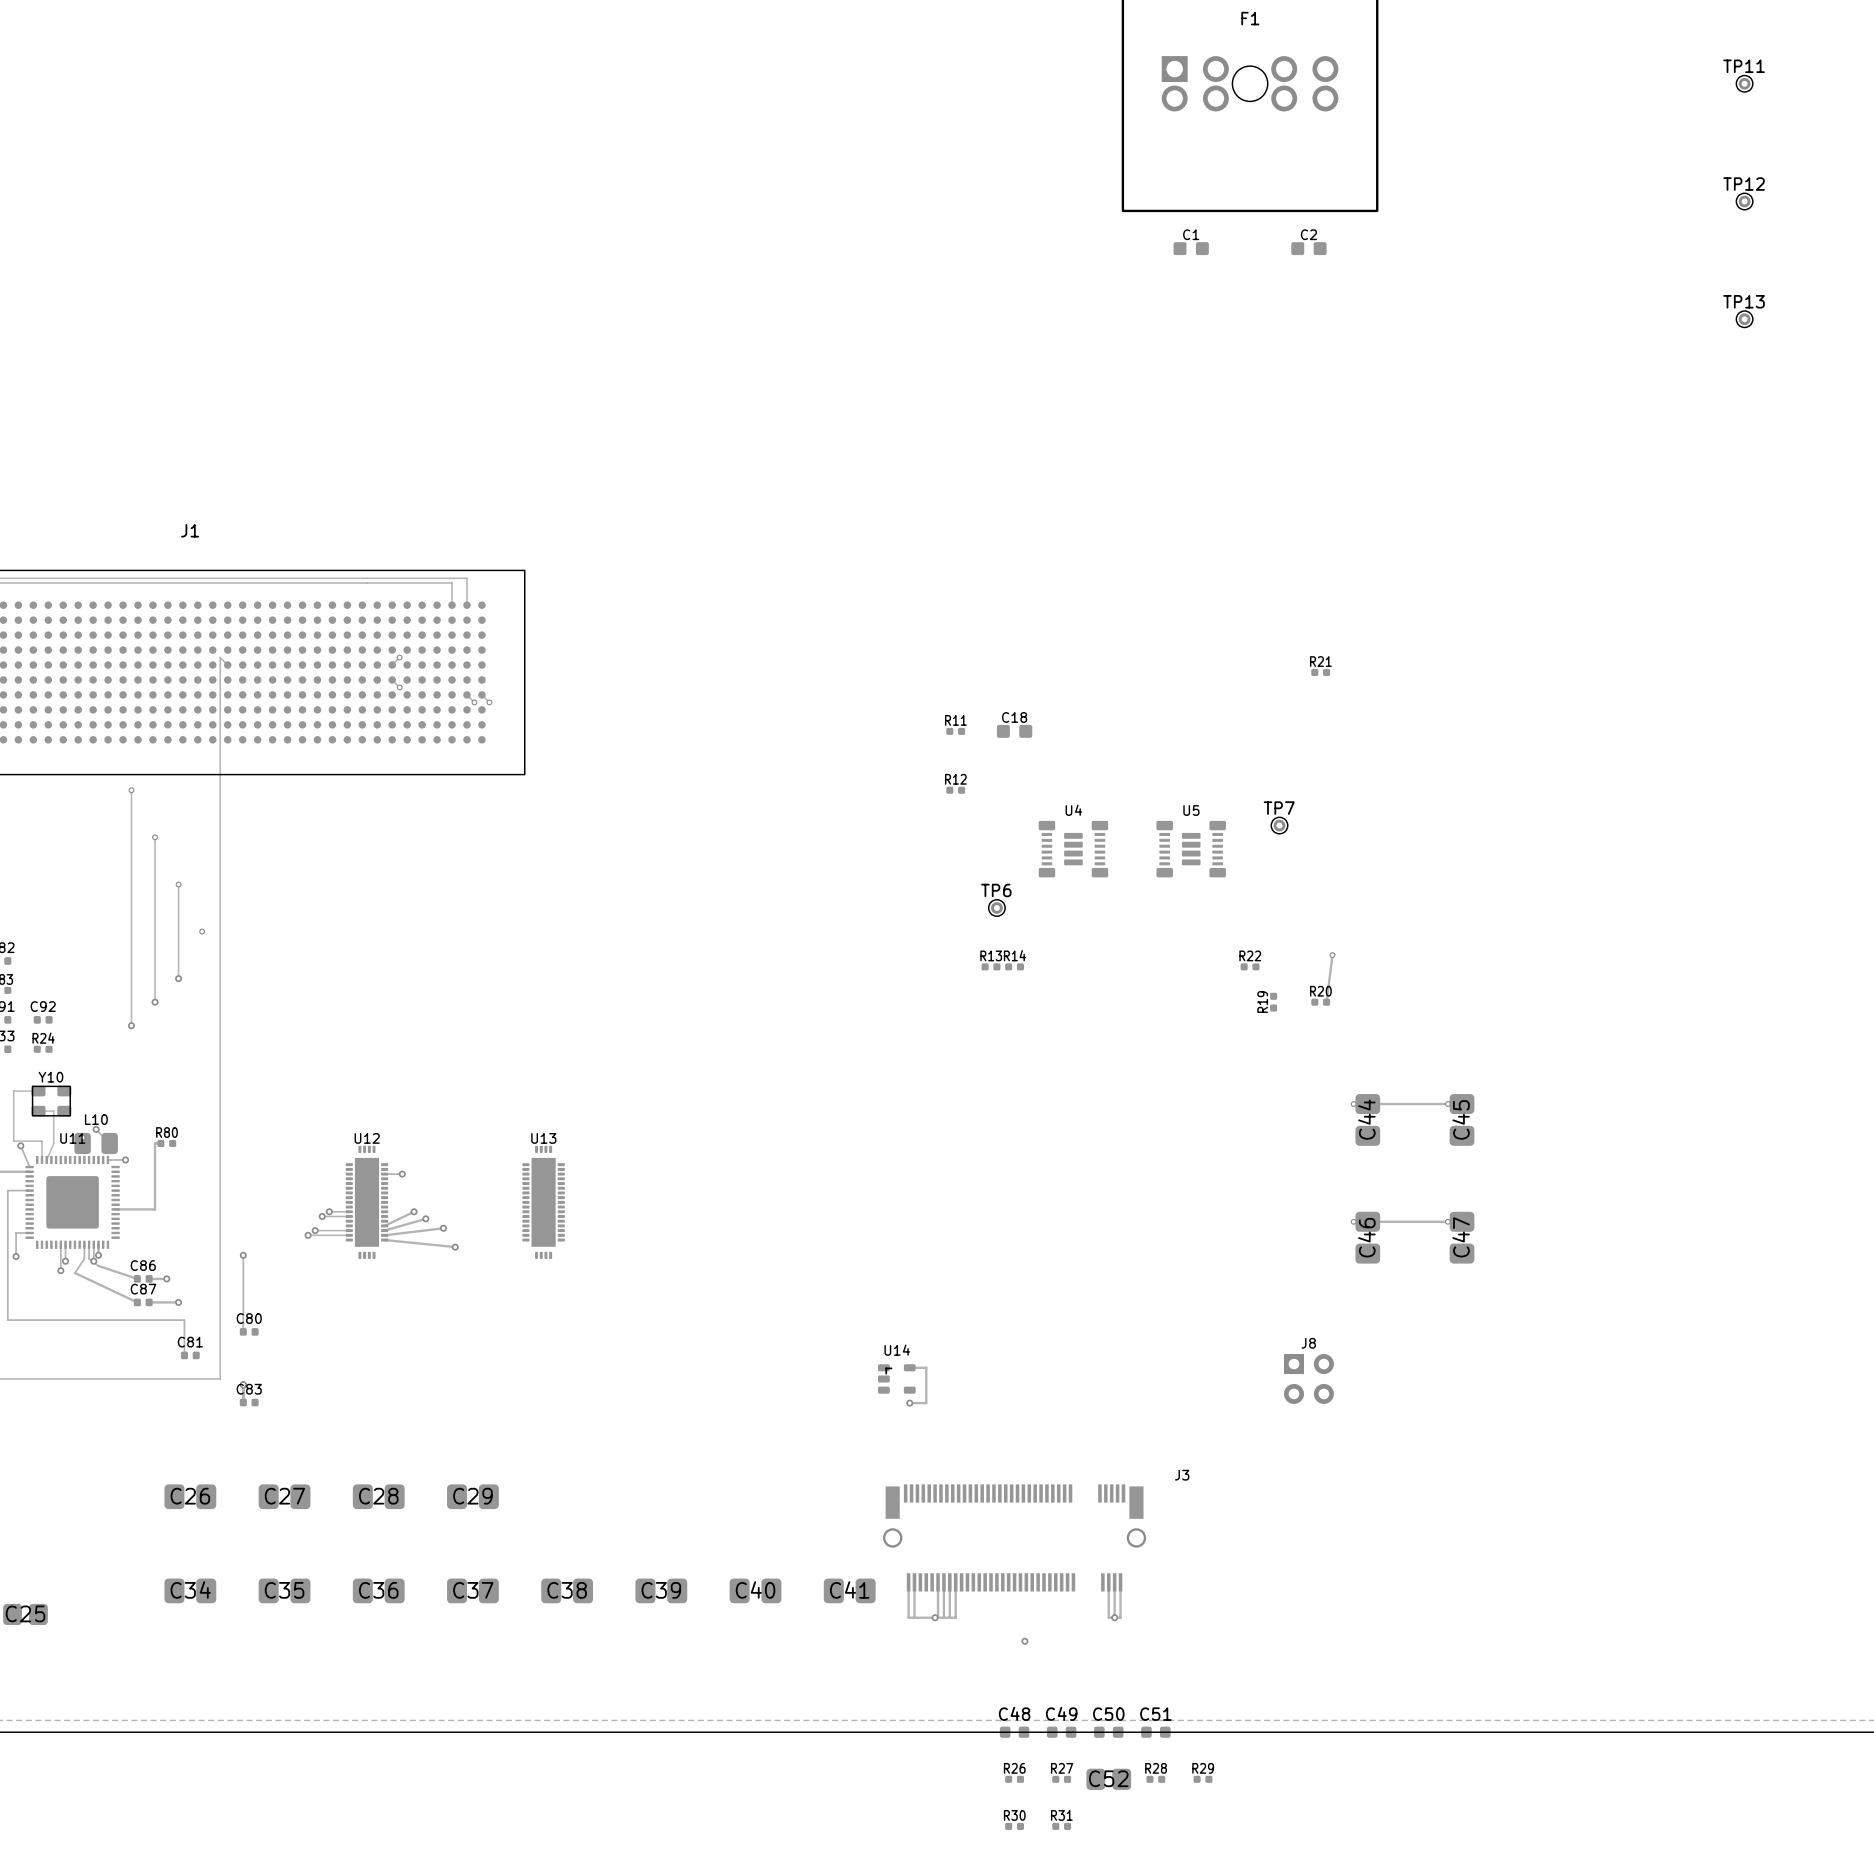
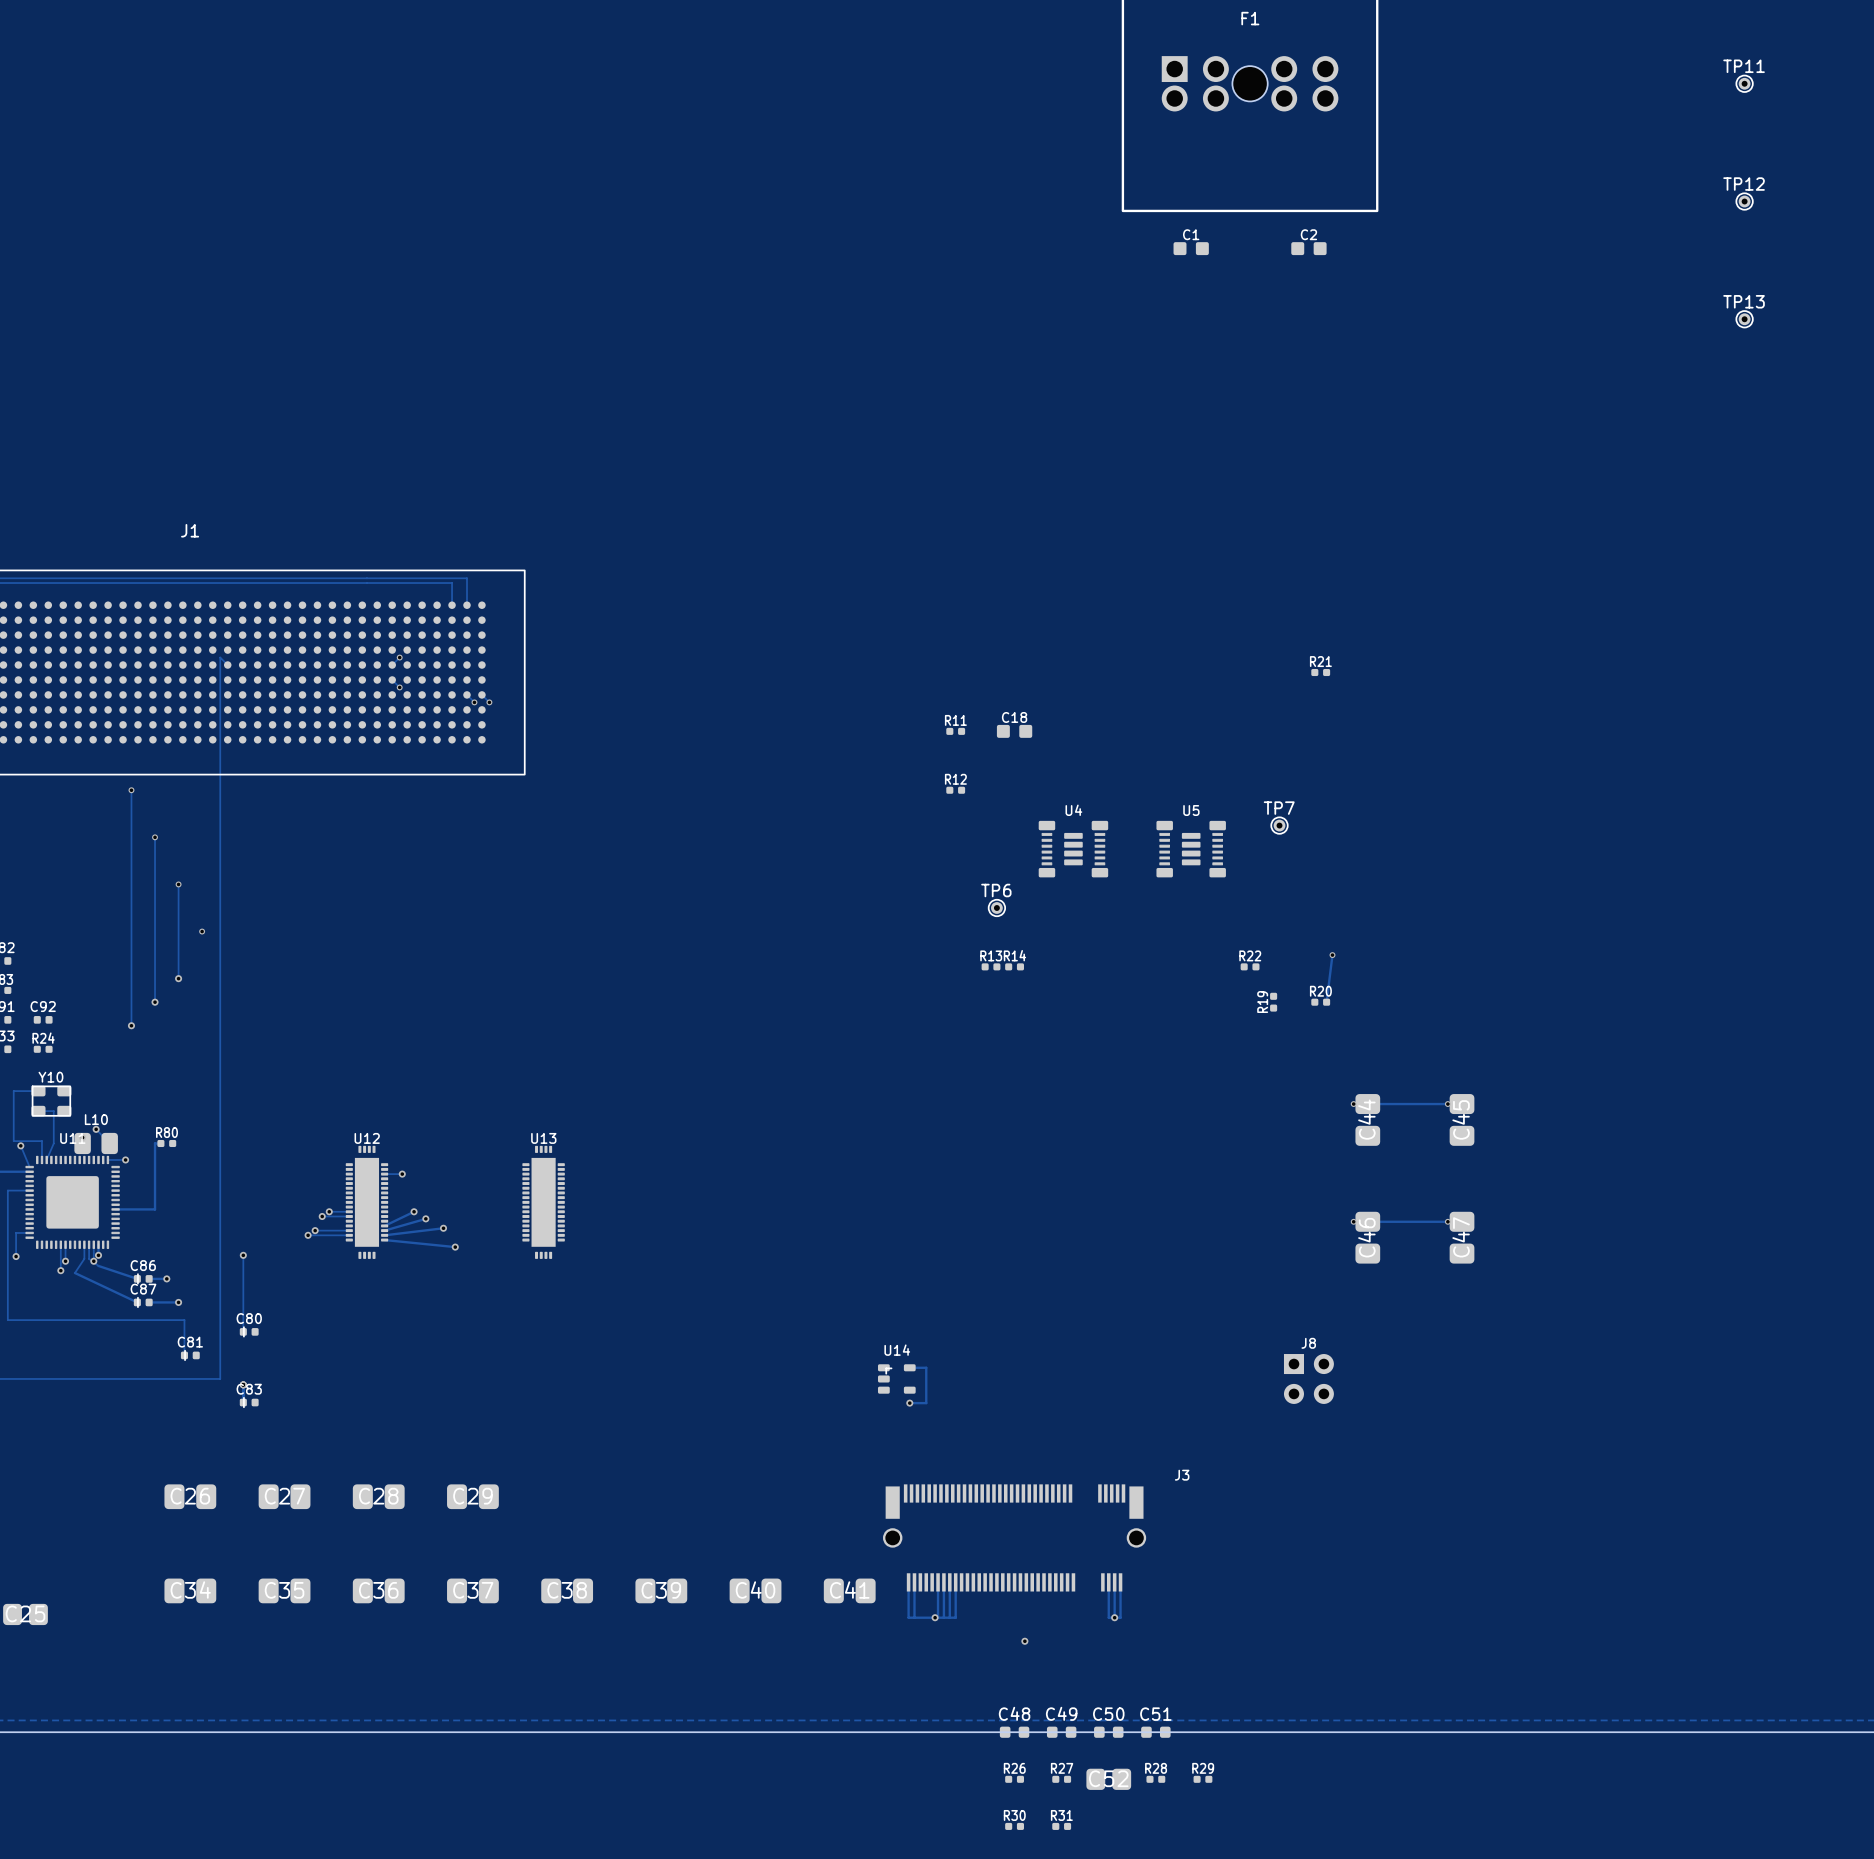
C86 footprint: [133, 1275, 153, 1283] -> [133, 1273, 153, 1285]
C87 footprint: [133, 1298, 153, 1307] -> [133, 1297, 153, 1308]
C80 footprint: [239, 1328, 259, 1336] -> [239, 1326, 259, 1338]
C81 footprint: [180, 1351, 200, 1360] -> [180, 1350, 200, 1361]
C83 footprint: [239, 1398, 259, 1407] -> [239, 1397, 259, 1408]

